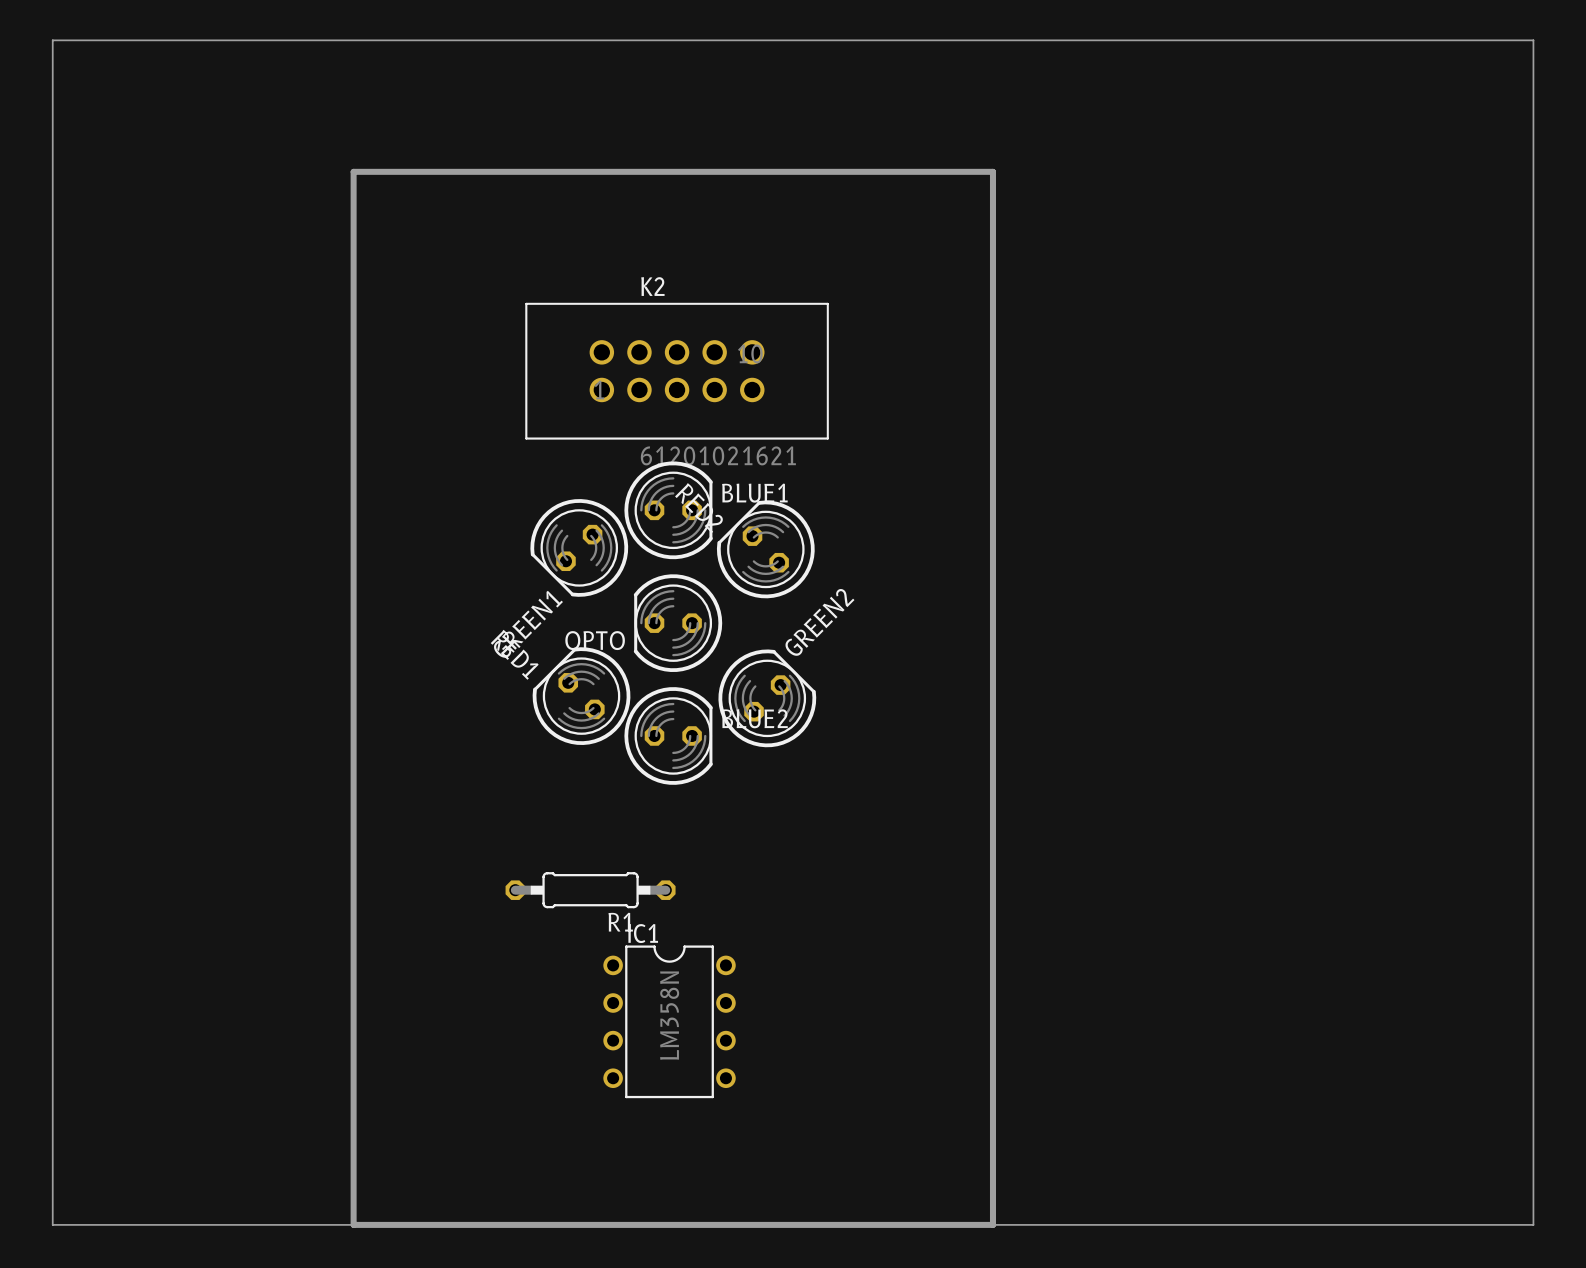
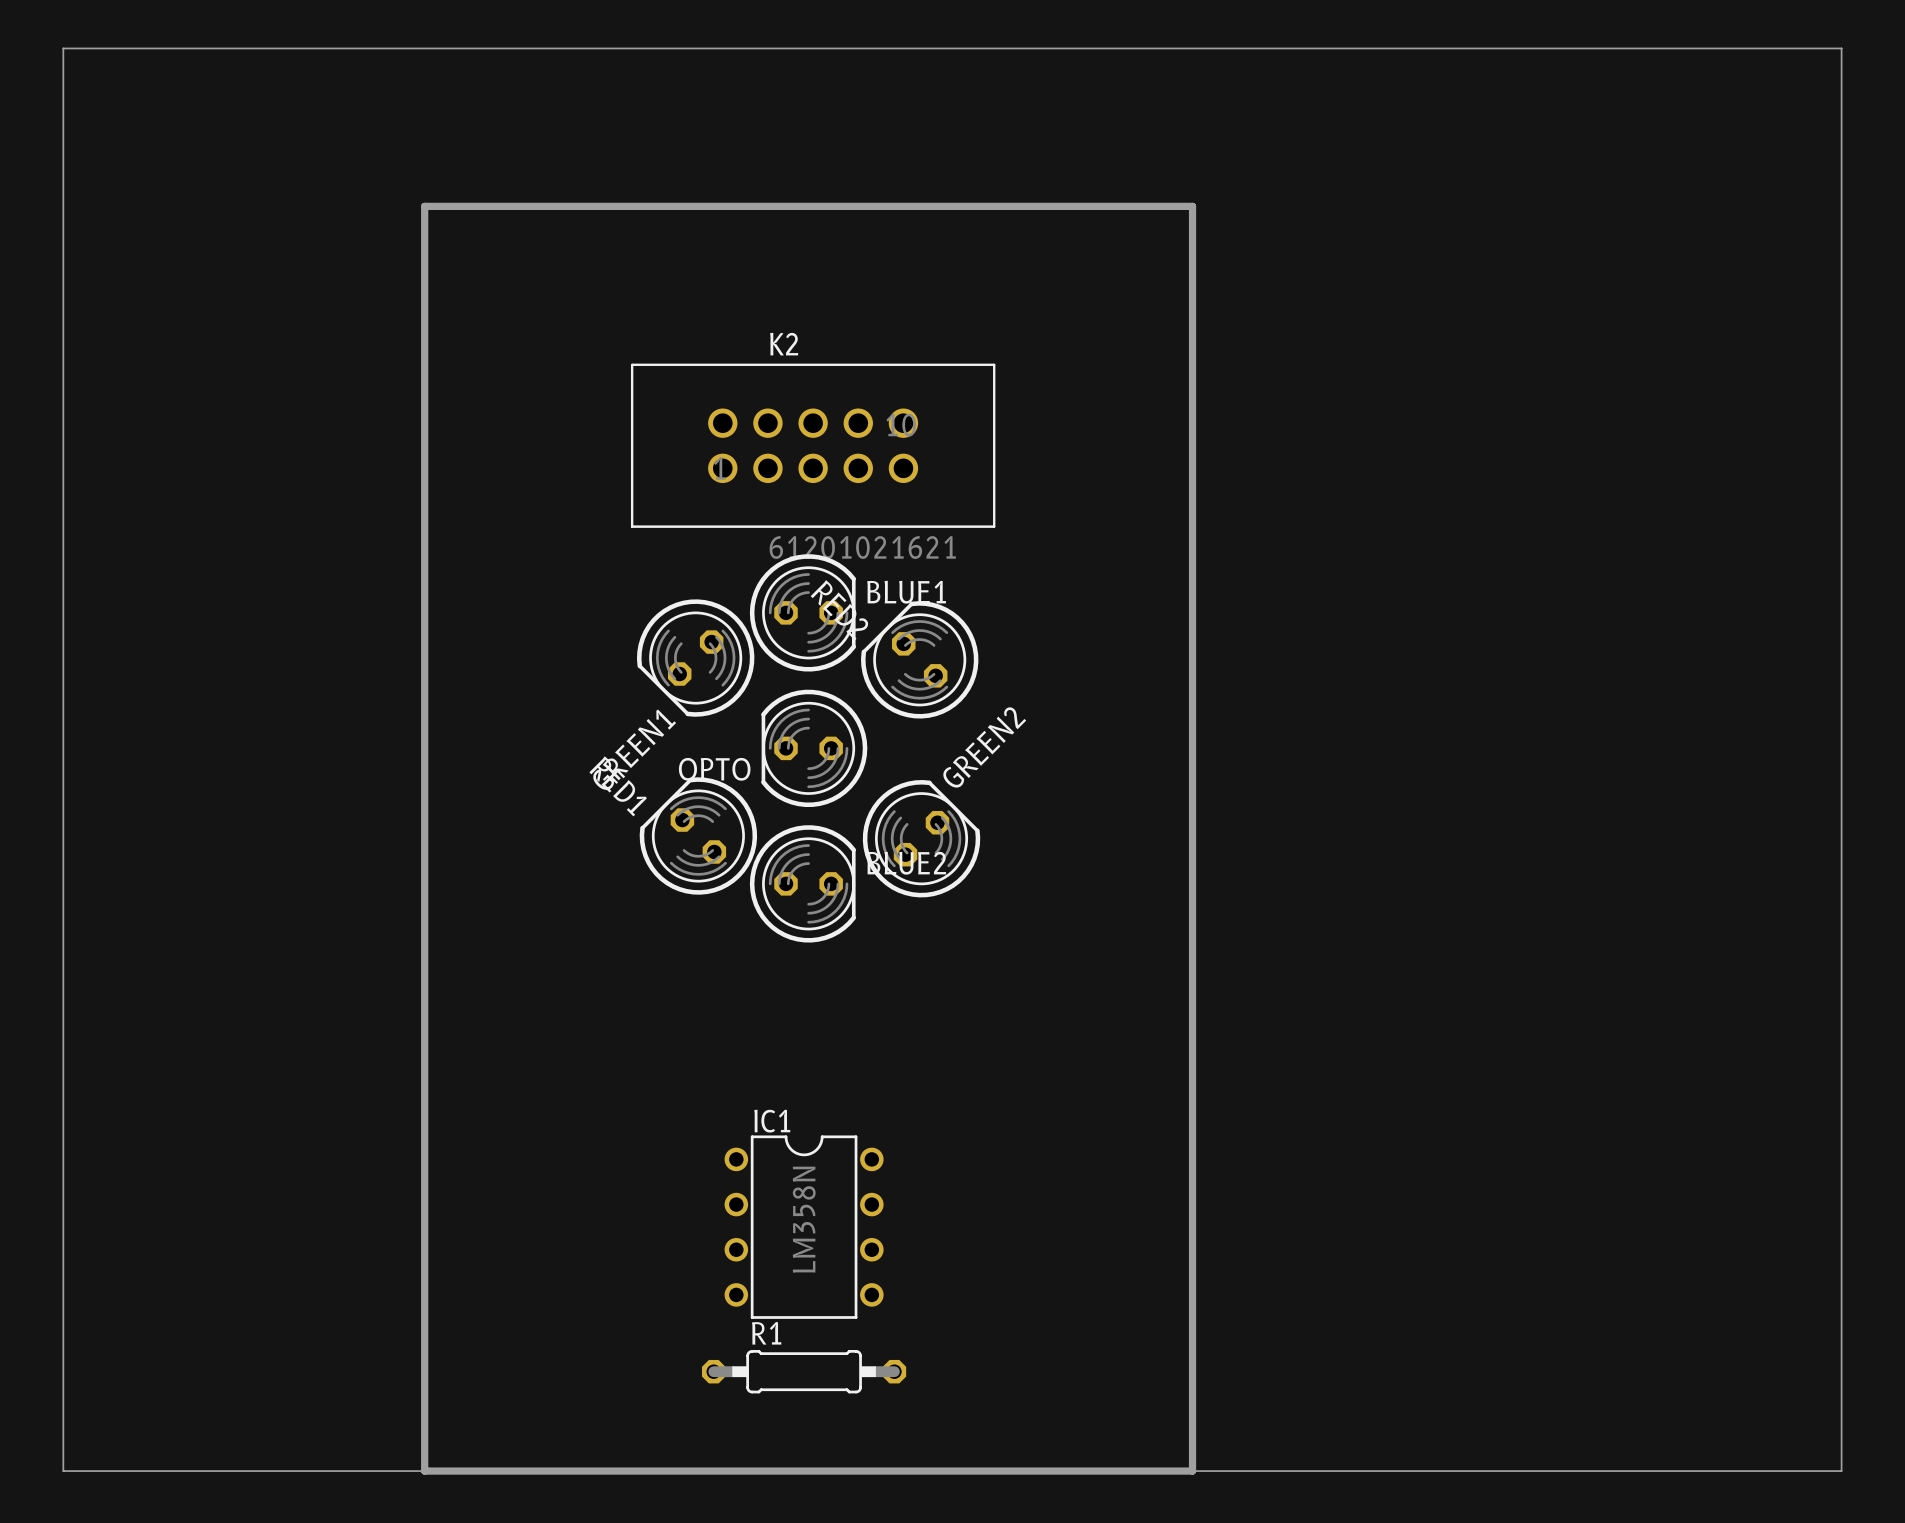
R1 position: (590, 890) -> (804, 1371)
R1 name position: R1 (620, 922) -> R1 (766, 1333)

